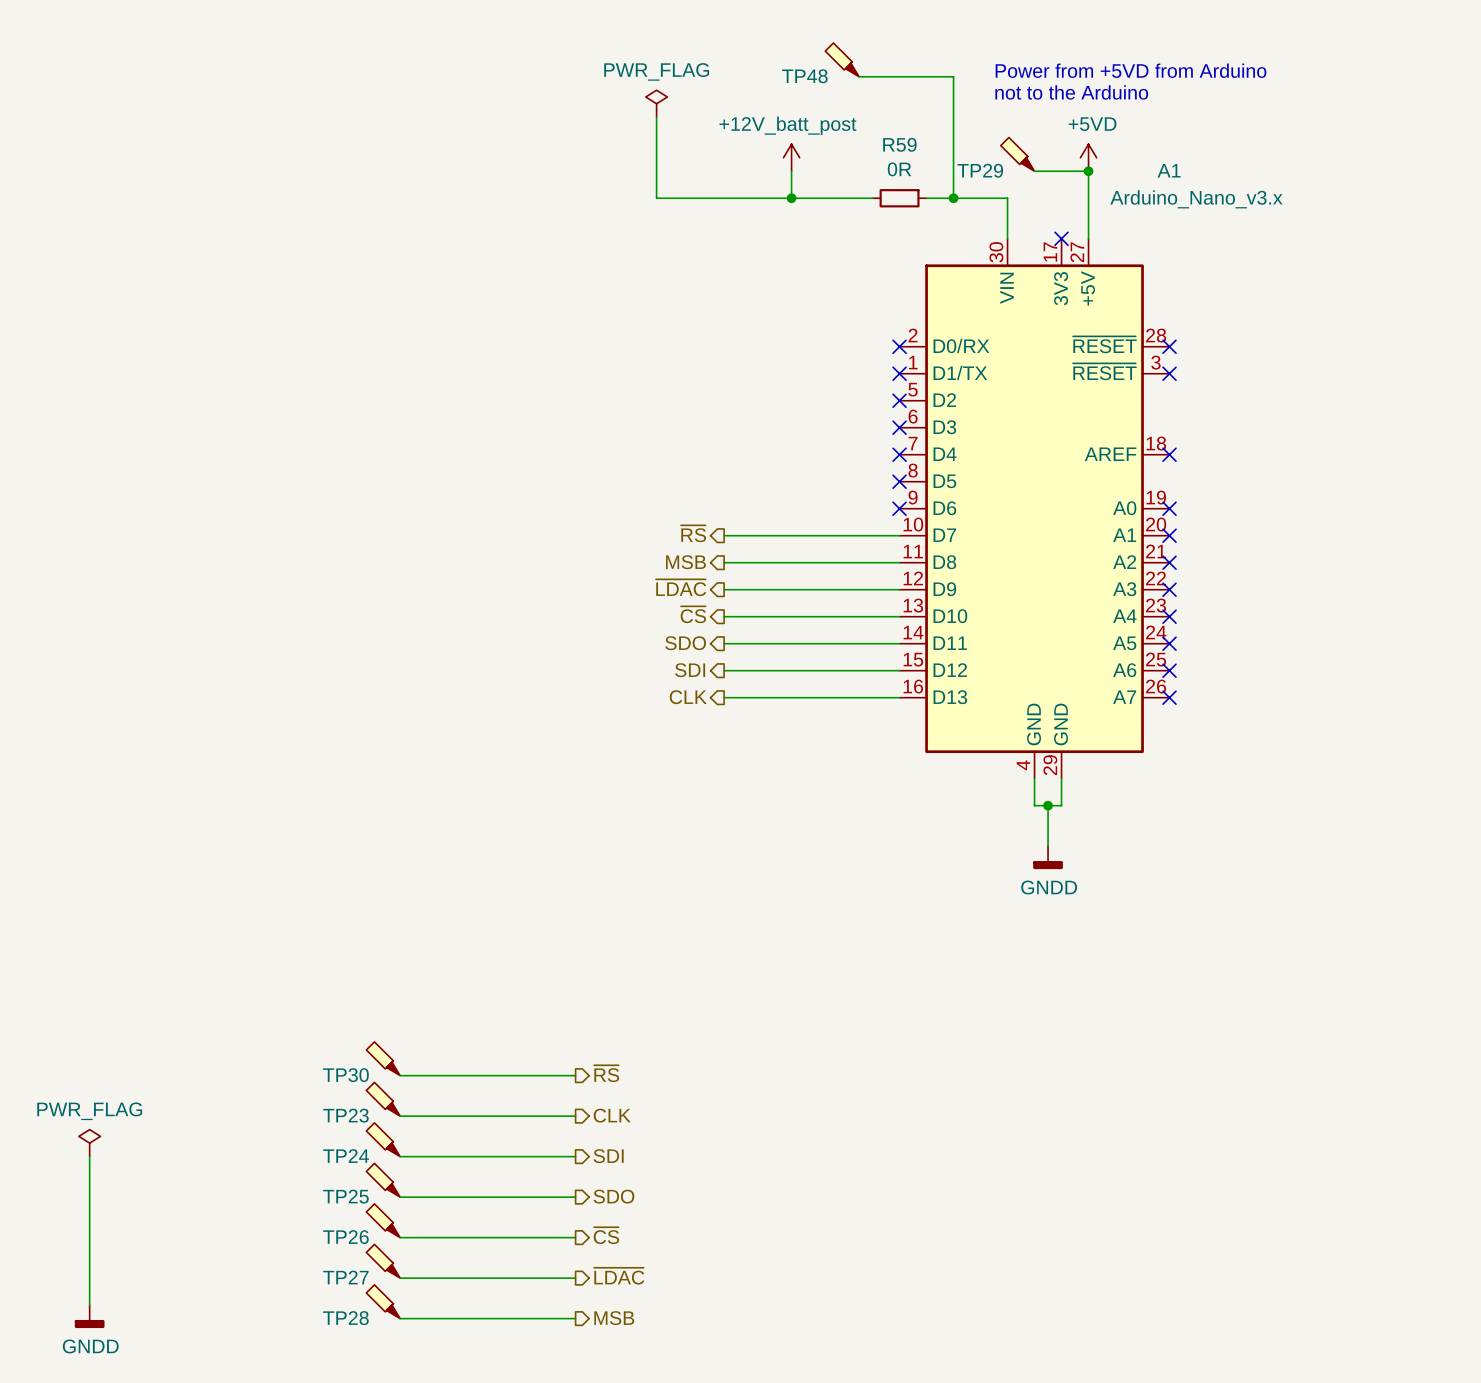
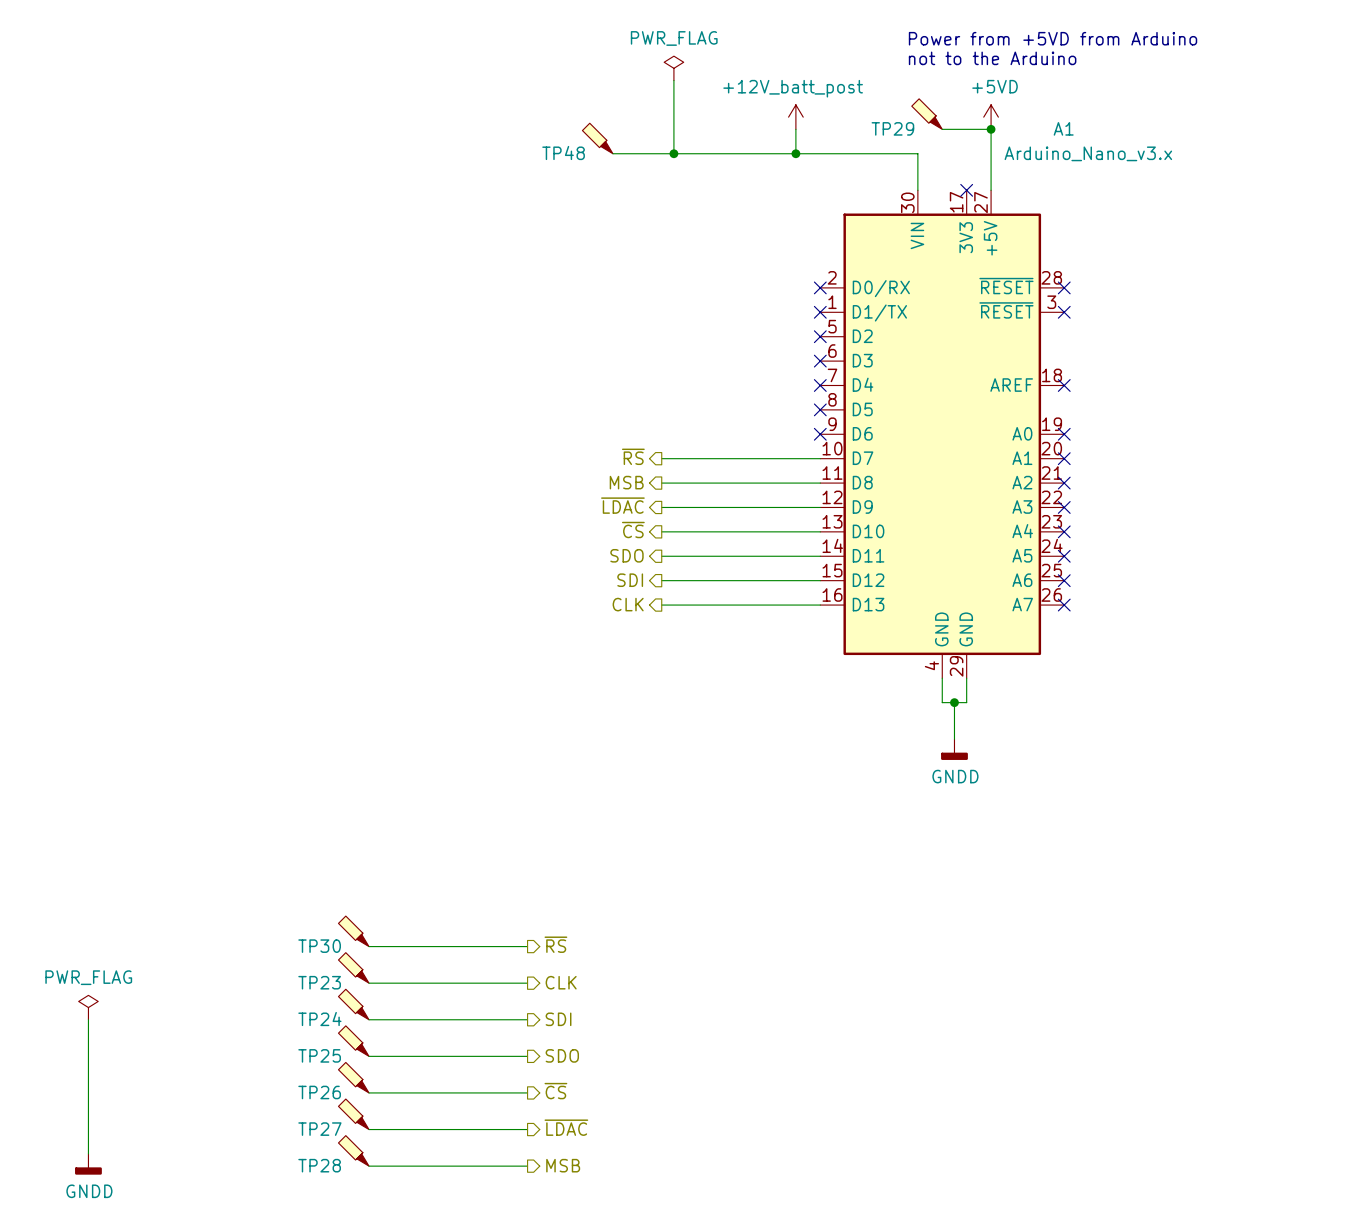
TP48 position: (842, 59) -> (597, 138)
wire: (859, 76) (953, 76) (953, 198) -> none
power symbol position: PWR_FLAG (656, 103) -> PWR_FLAG (673, 68)
wire: (656, 117) (656, 198) (670, 198) -> none
wire: none -> (673, 80) (673, 153)
power symbol position: +12V_batt_post (791, 157) -> +12V_batt_post (795, 117)
wire: (791, 171) (791, 198) -> none
wire: none -> (795, 129) (795, 153) (844, 153)
junction: none -> (673, 153)
junction: (791, 198) -> none
junction: none -> (795, 153)
R59: 0R (899, 198) -> none
junction: (953, 198) -> none

